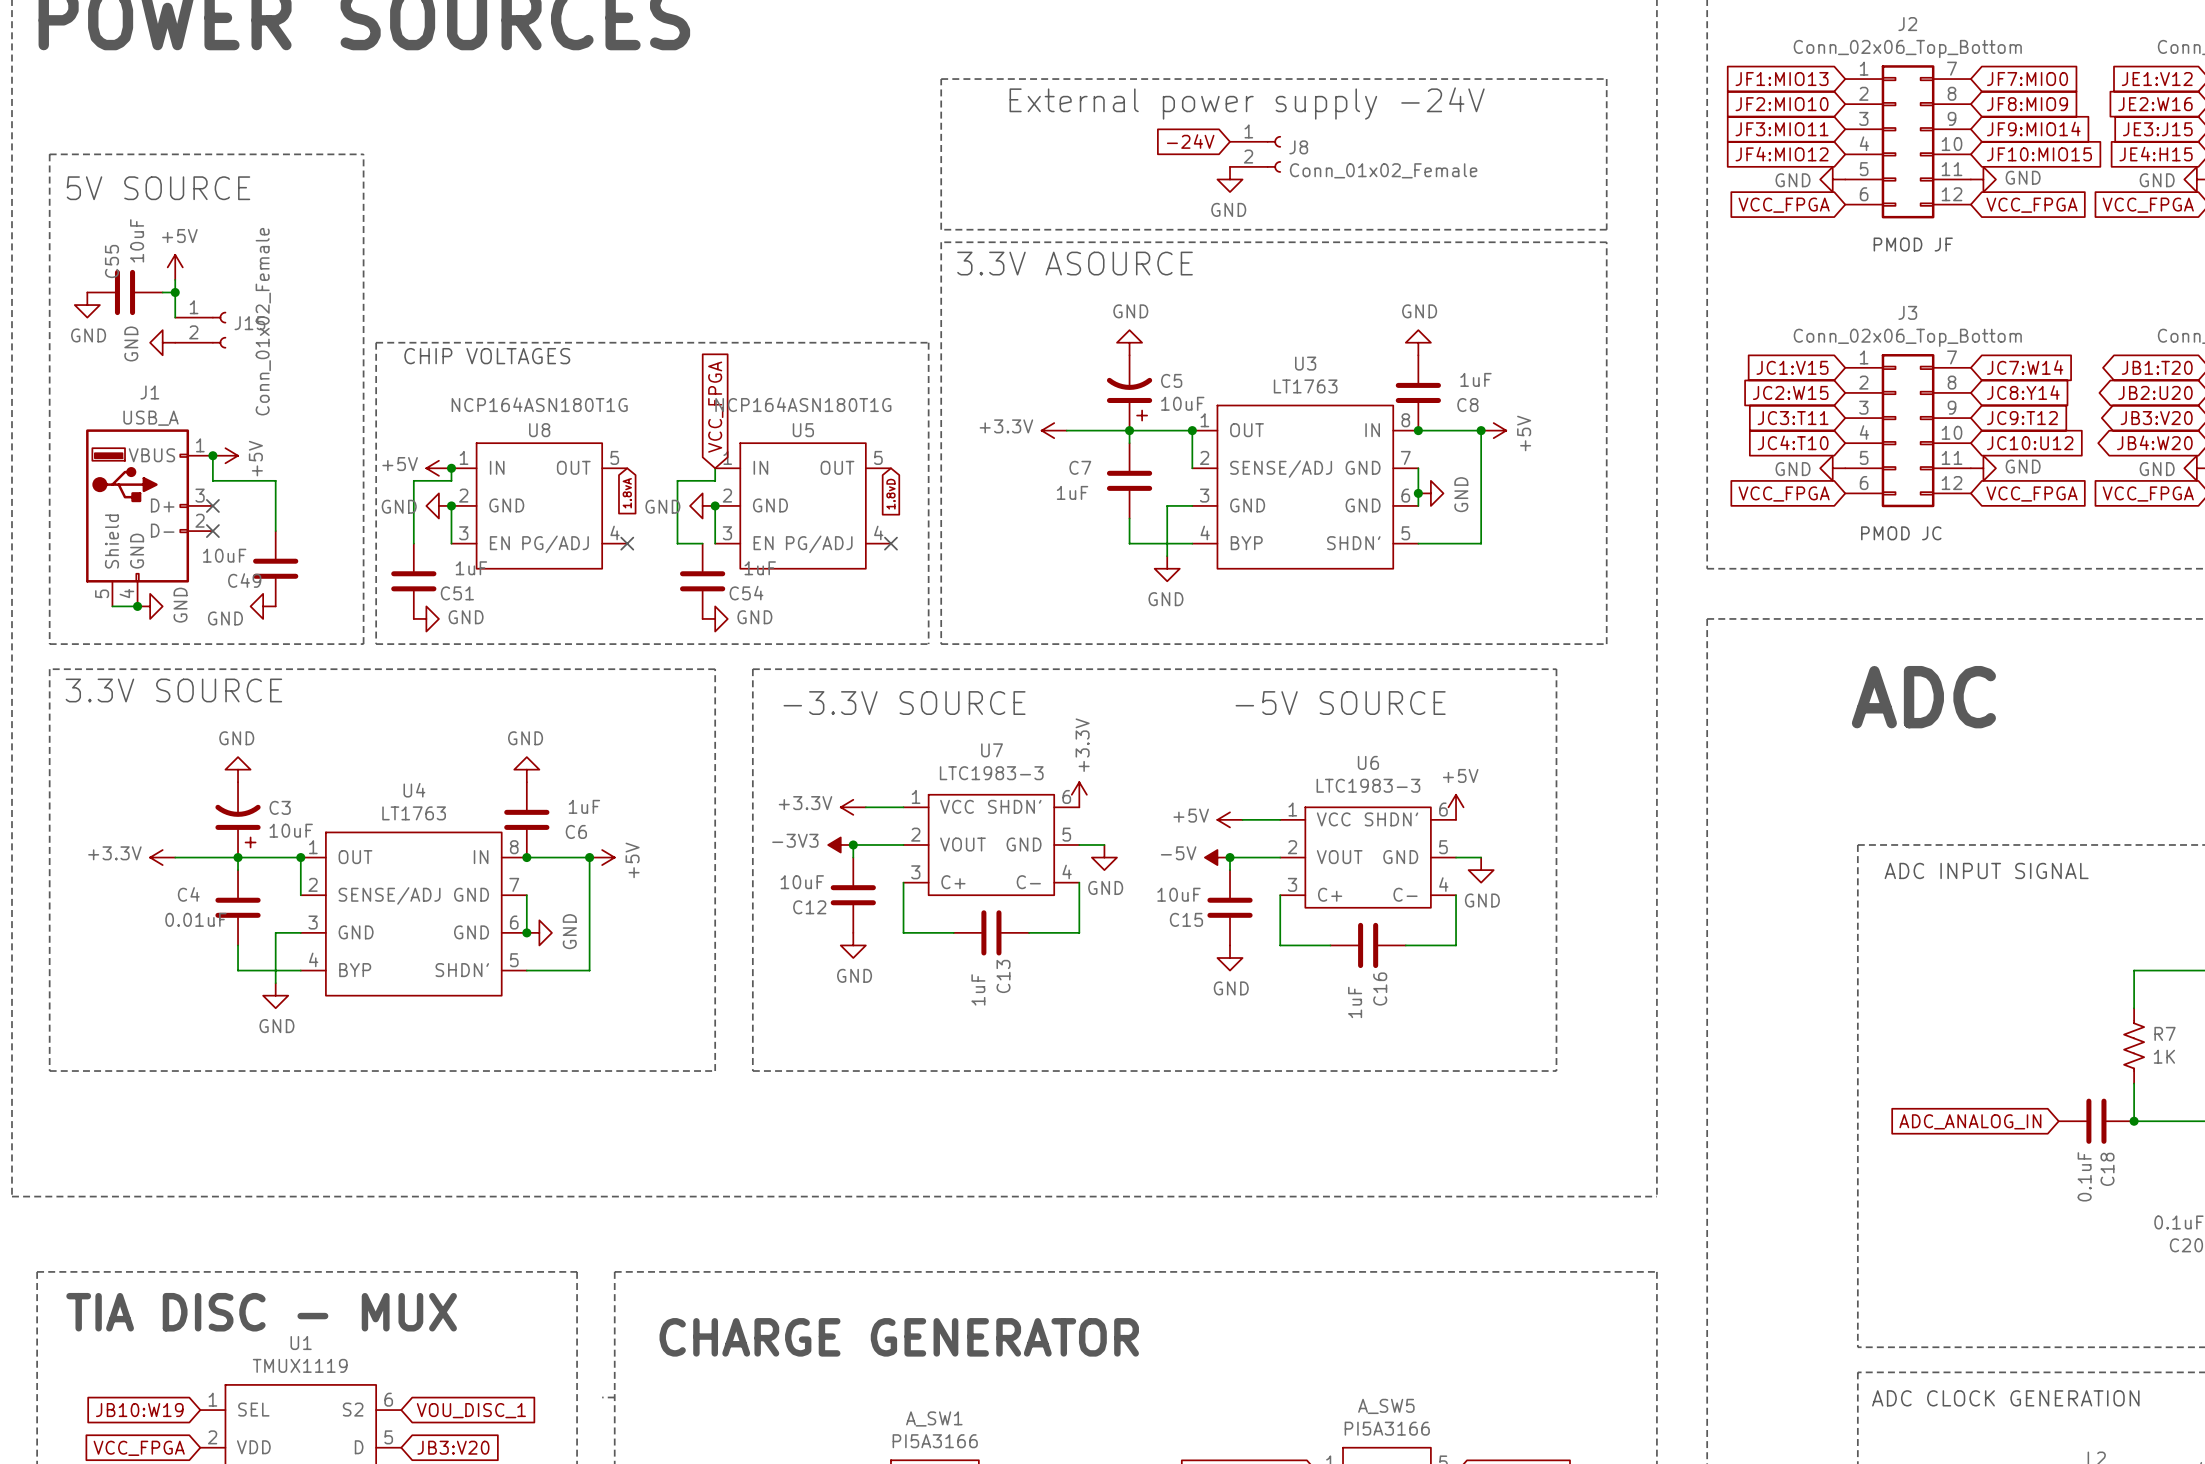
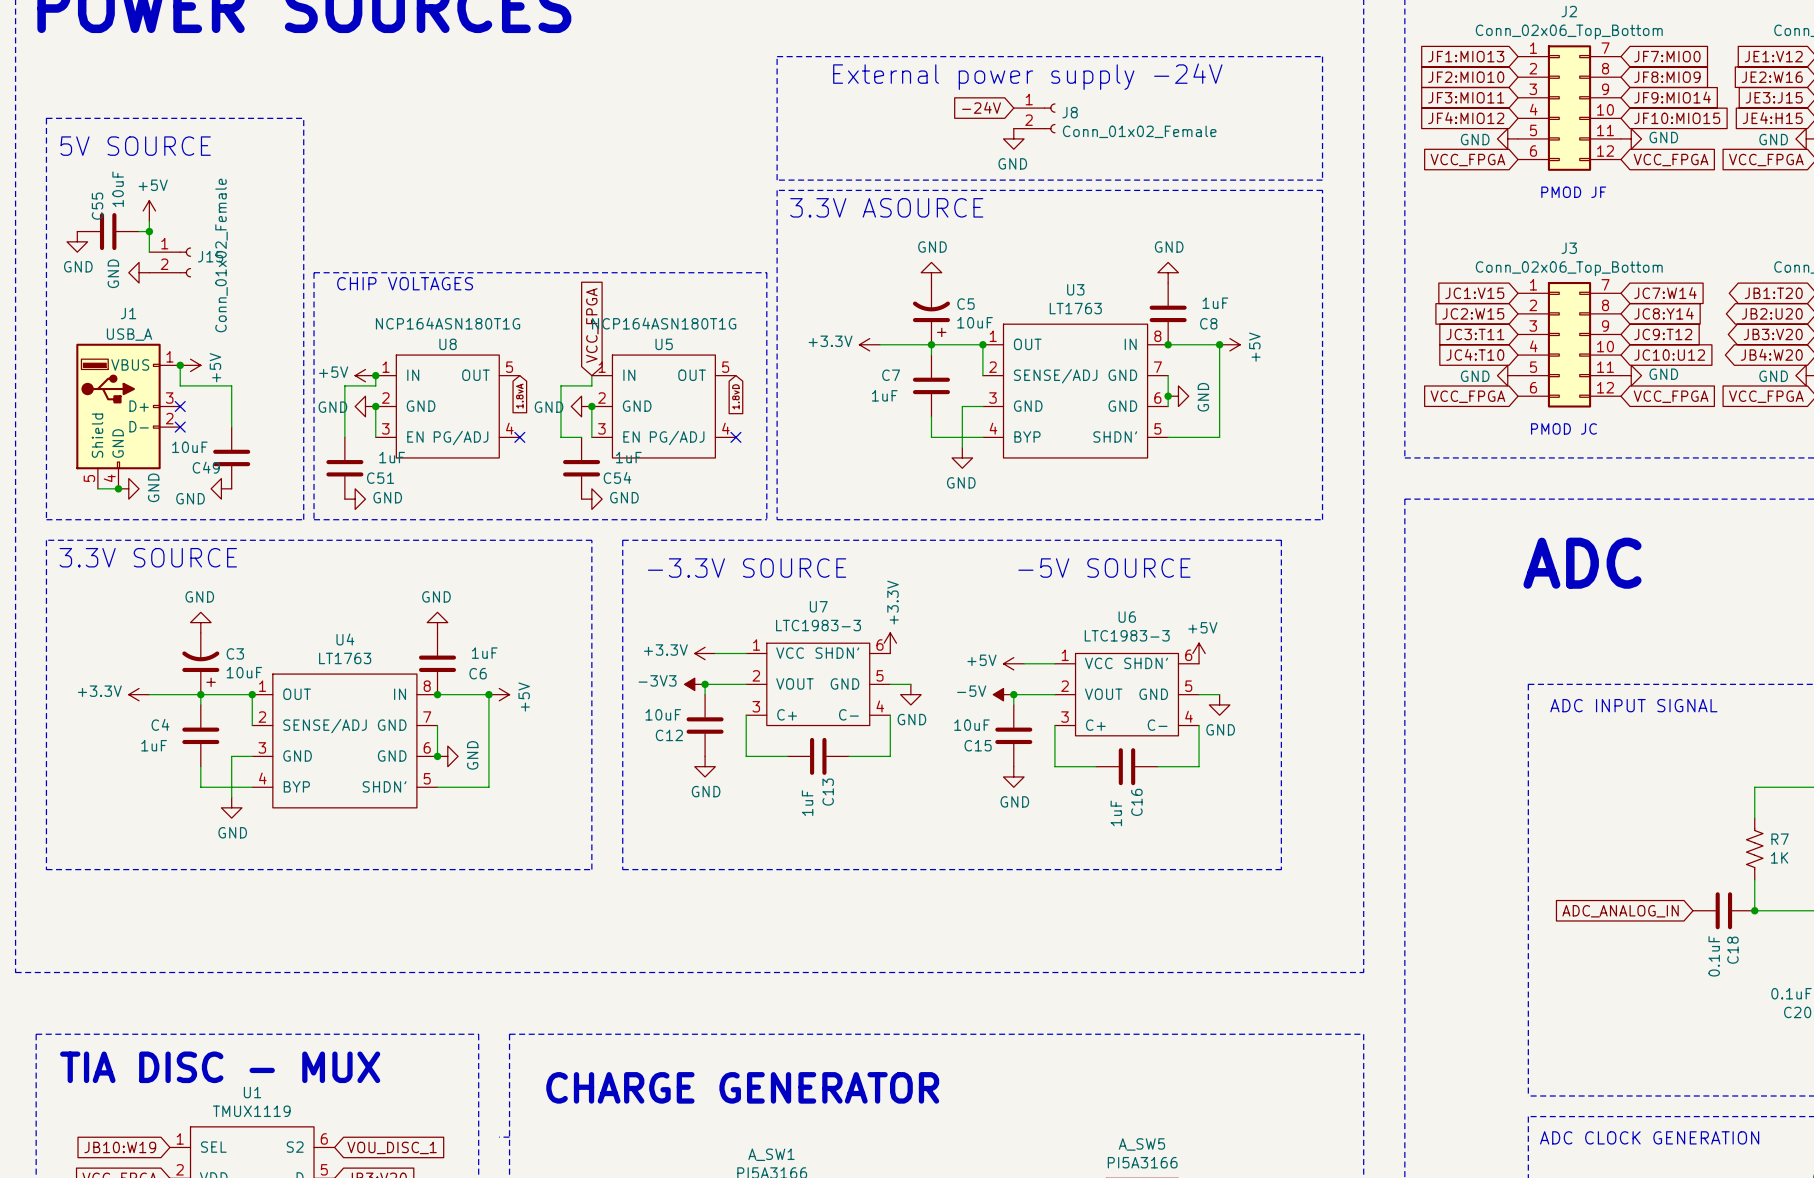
C4 value: 0.01uF (195, 919) -> 1uF (154, 745)

